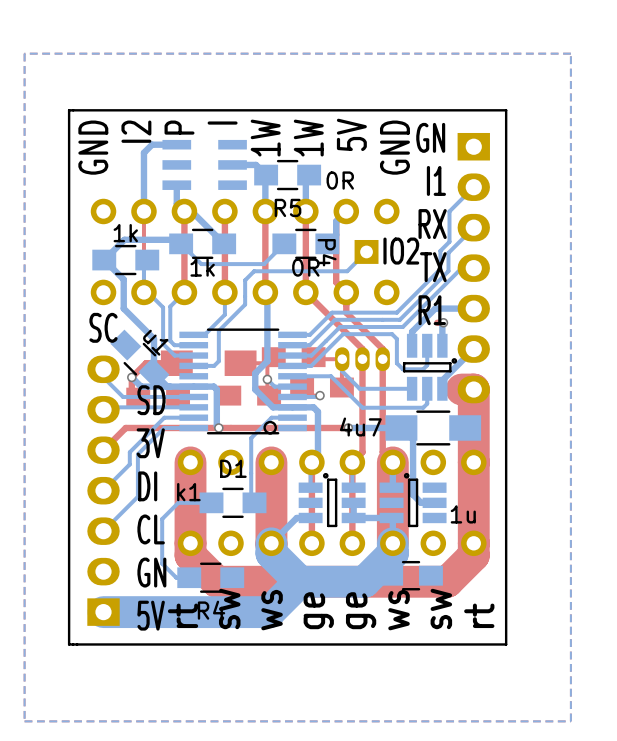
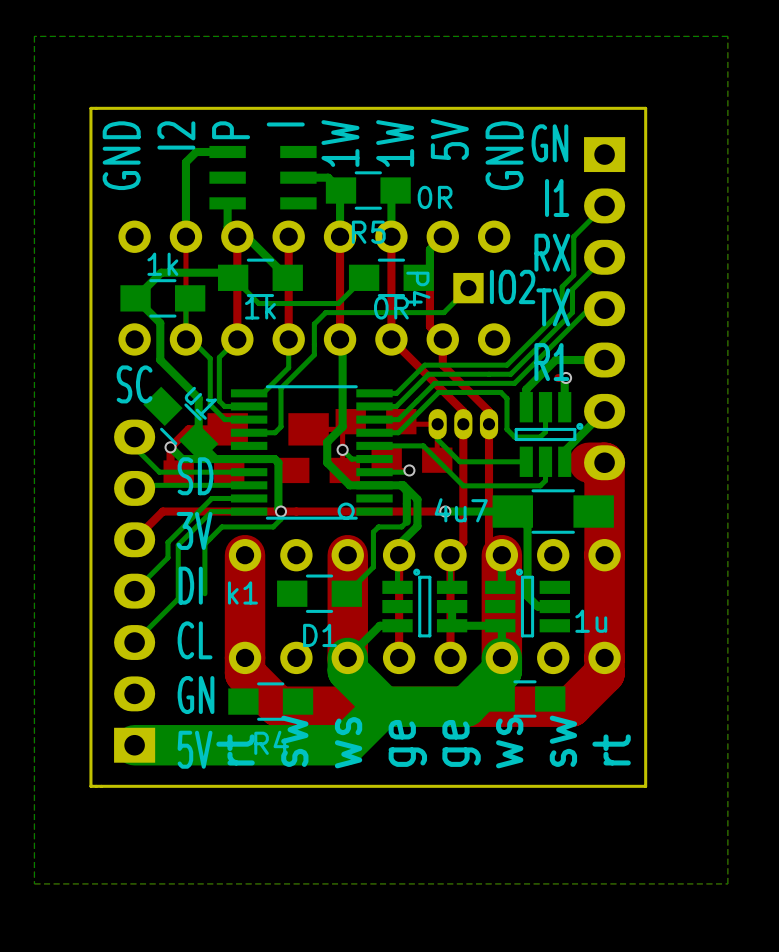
bottom track: none -> (401, 485) (417, 499) (417, 526) (399, 544) (399, 555)
bottom track: (292, 417) (271, 417) (251, 438) (251, 499) (254, 502) -> none
bottom track: none -> (280, 511) (280, 519) (273, 526) (221, 526) (204, 543) (204, 593)
bottom track: (317, 436) (317, 456) -> (406, 521) (401, 526) (378, 526) (373, 532) (373, 567) (346, 593)
D1 name position: D1 (233, 468) -> D1 (319, 635)
bottom track: (211, 502) (178, 502) (162, 519) (162, 563) (176, 577) (189, 577) -> none
D1 position: (233, 502) -> (319, 593)

